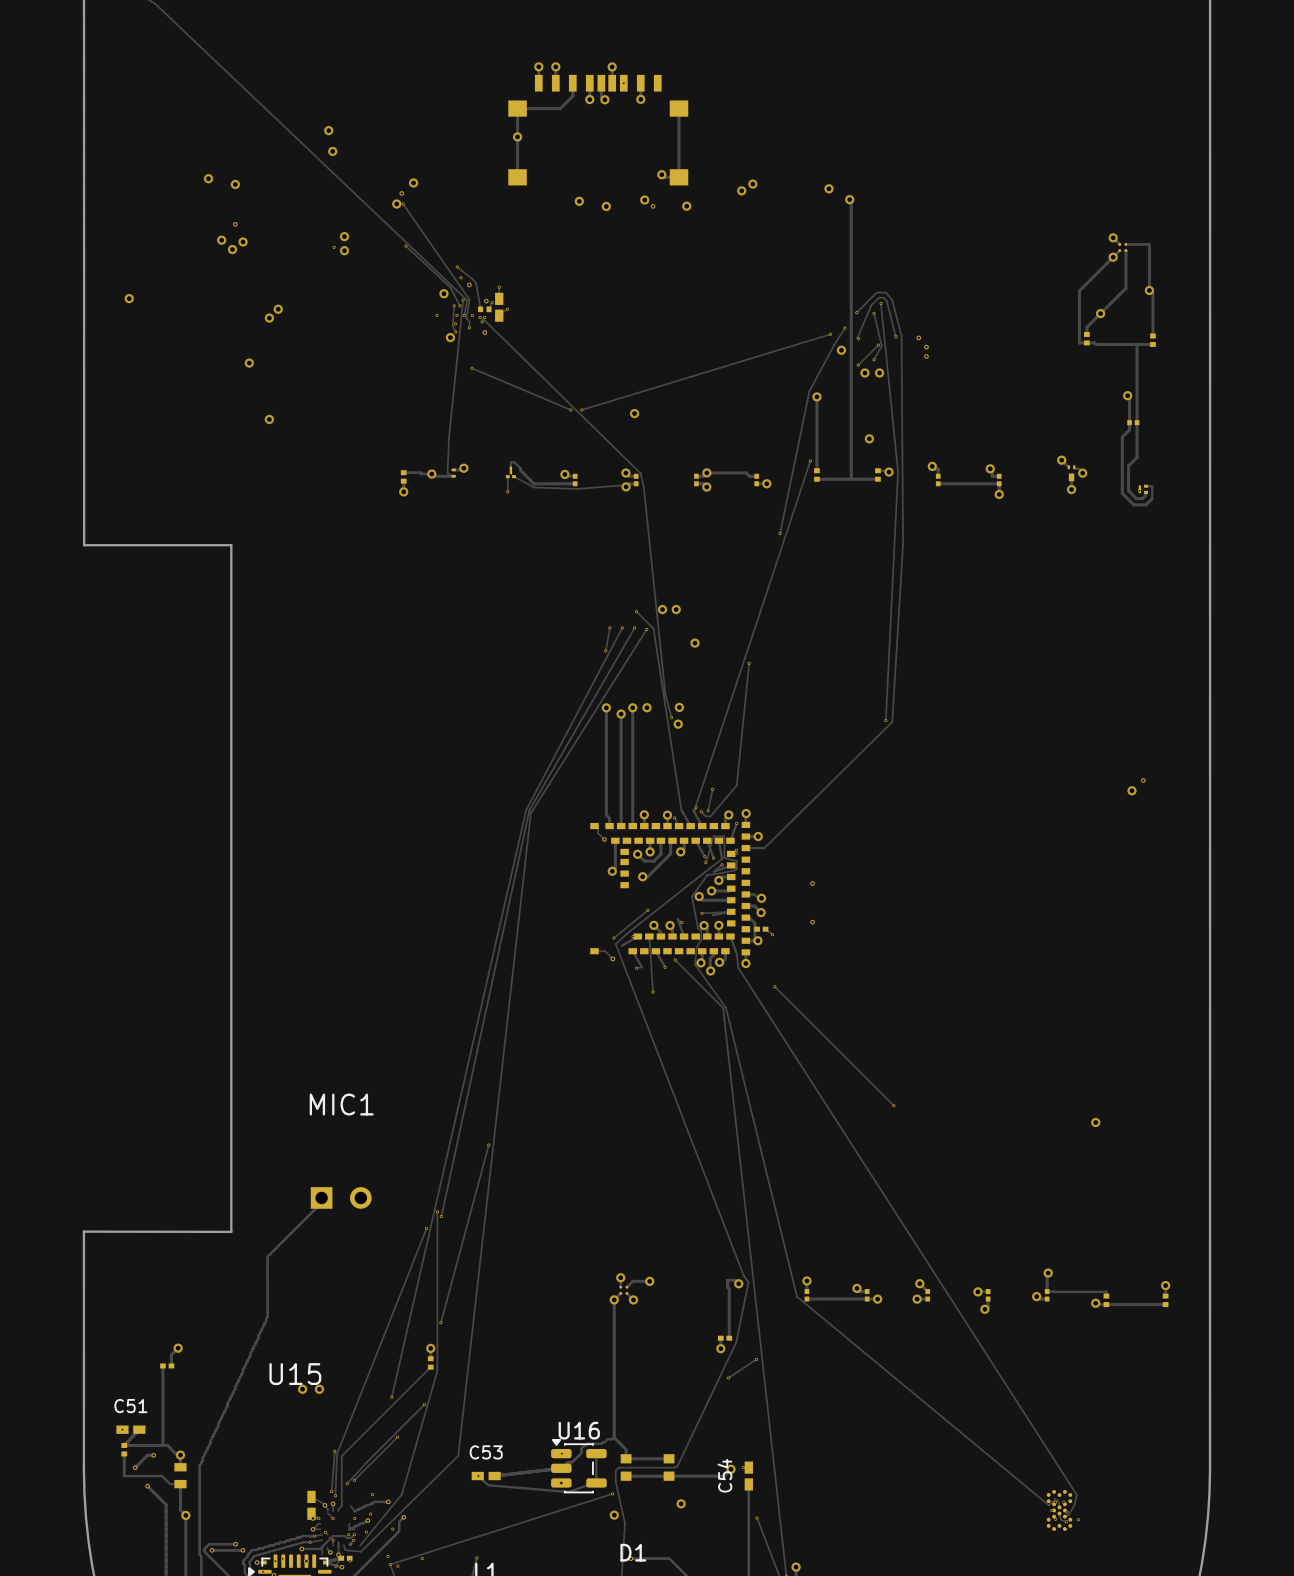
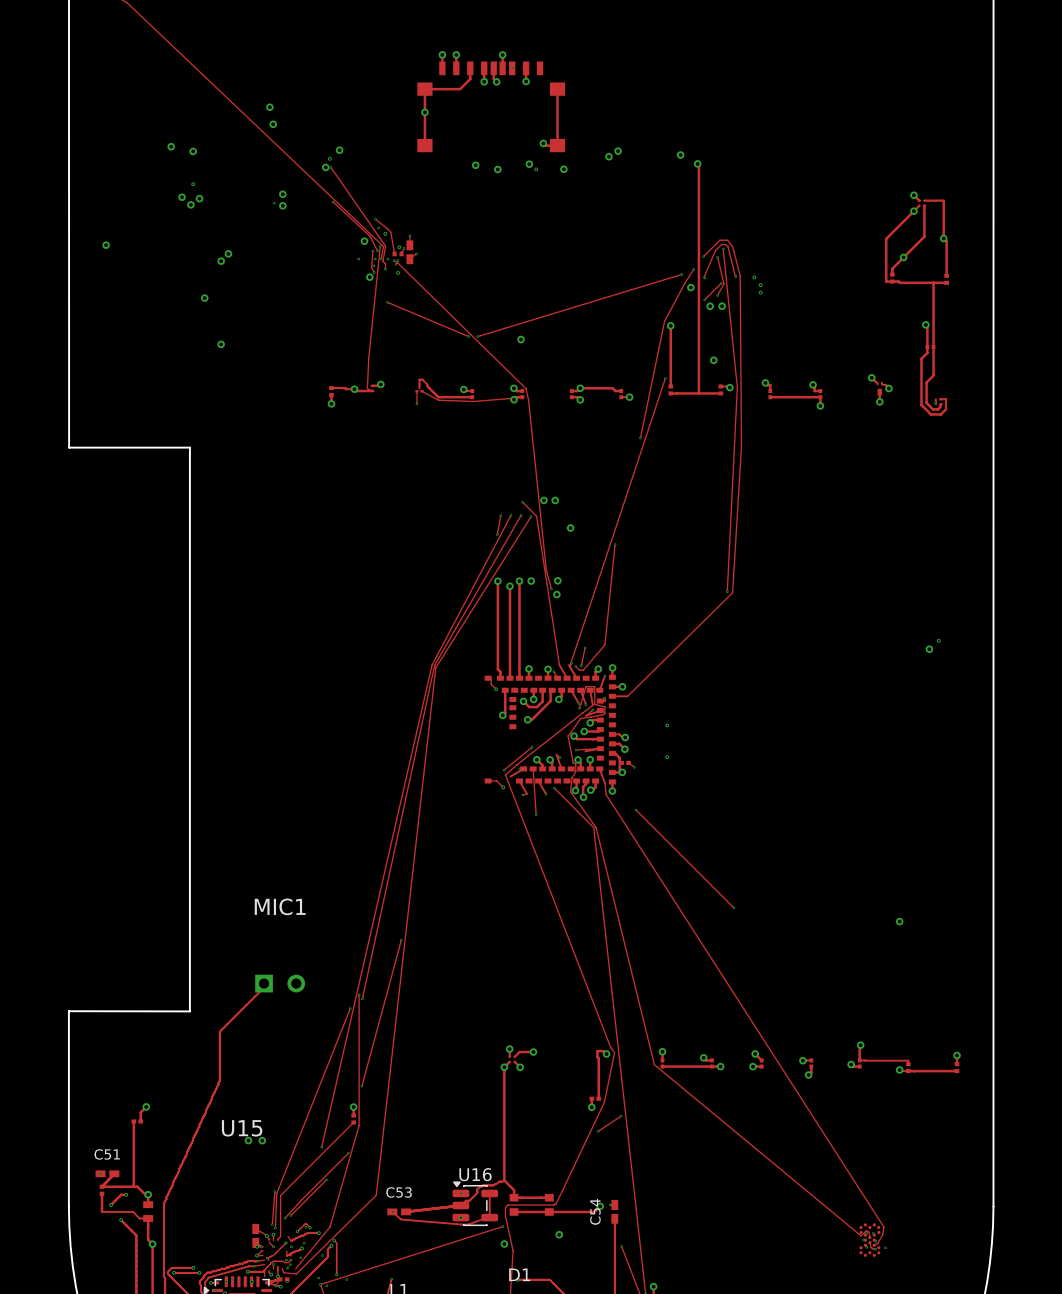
track: none -> (310, 1227) (305, 1223) (297, 1231)
via: none -> (310, 1227)
via: none -> (297, 1231)
track: none -> (334, 1240) (336, 1242) (336, 1274)
via: none -> (334, 1240)
track: none -> (286, 1242) (273, 1255) (266, 1258)
via: none -> (286, 1242)
via: none -> (336, 1274)

